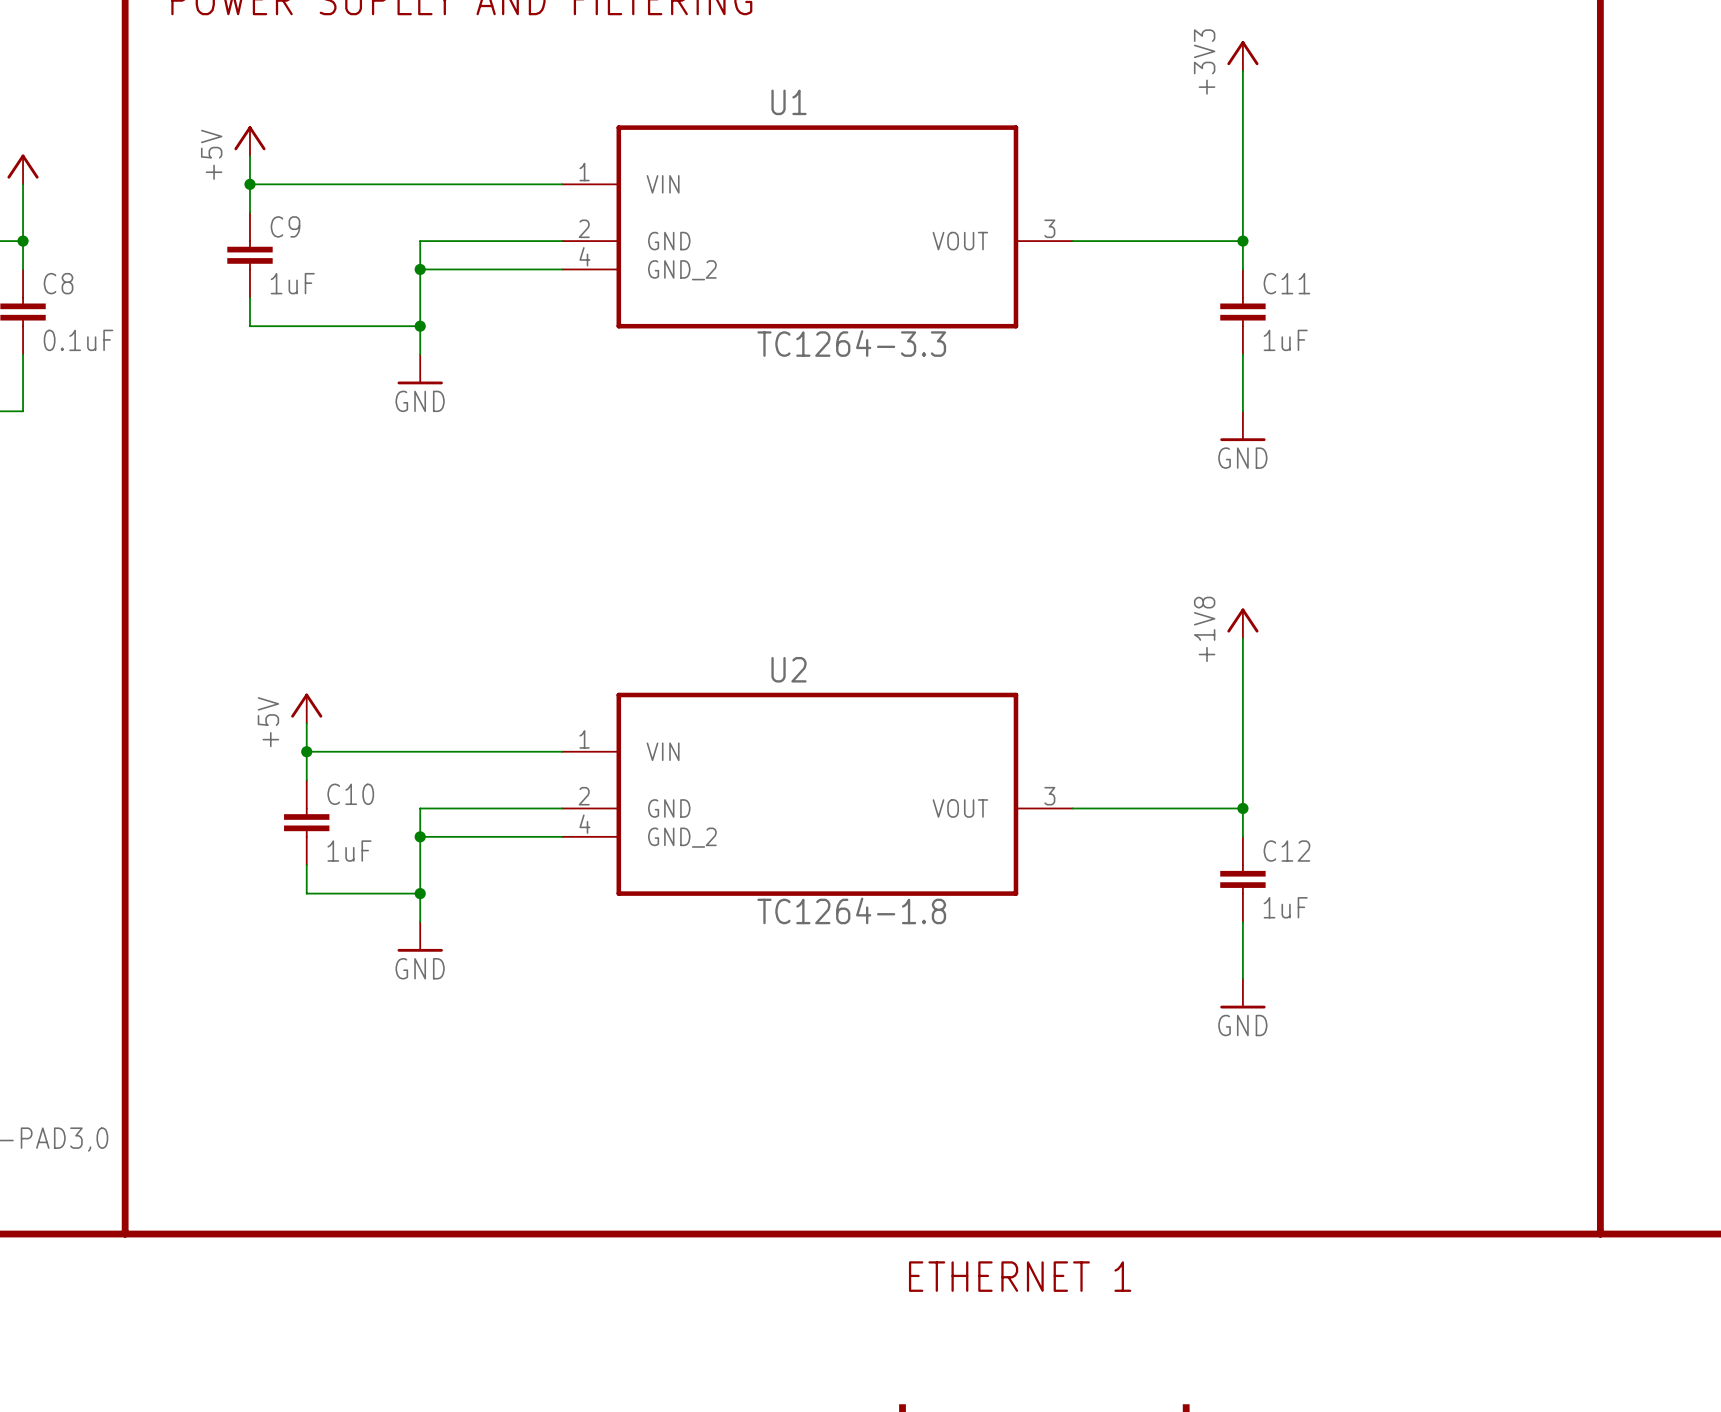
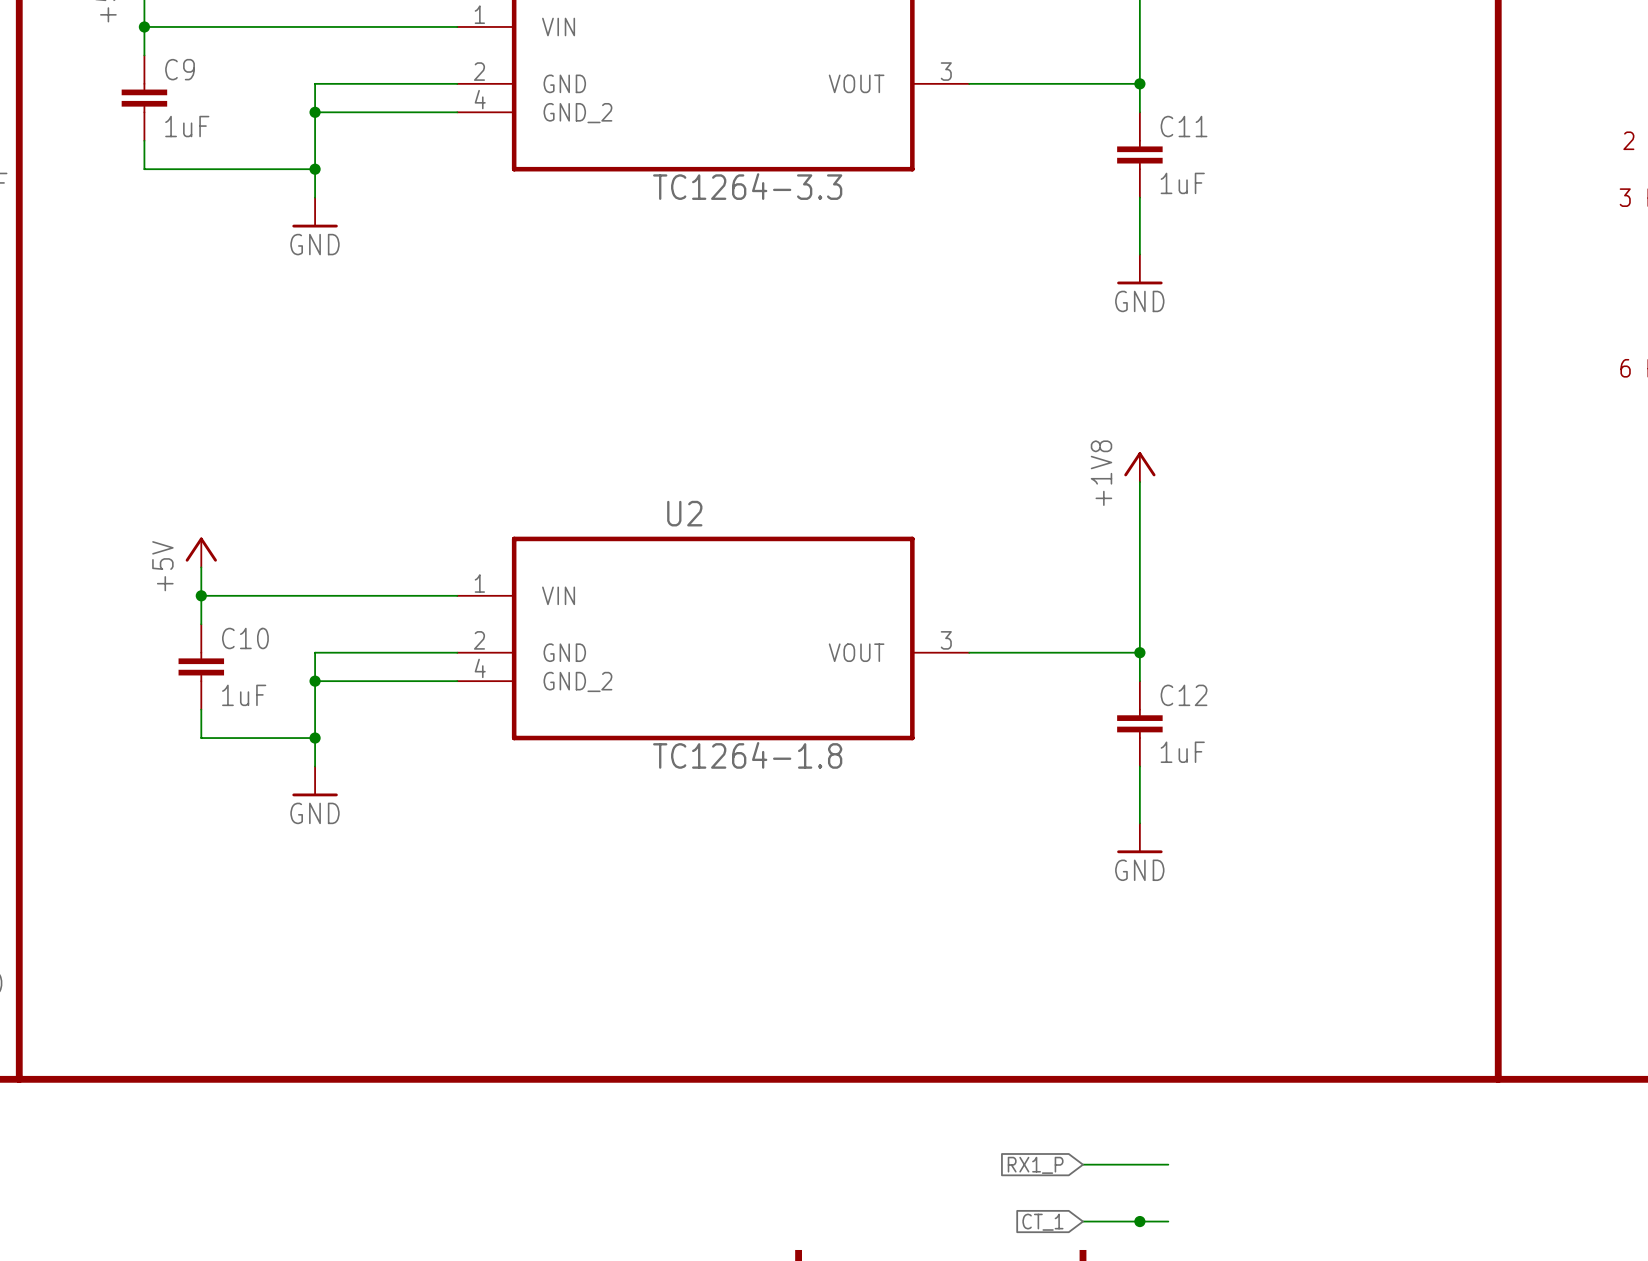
text: ETHERNET 1 (1020, 1276) -> none
global label: none -> RX1_P (1035, 1165)
wire: none -> (1083, 1164) (1168, 1164)
wire: none -> (1083, 1221) (1168, 1221)
junction: none -> (1139, 1221)
global label: none -> CT_1 (1042, 1222)

